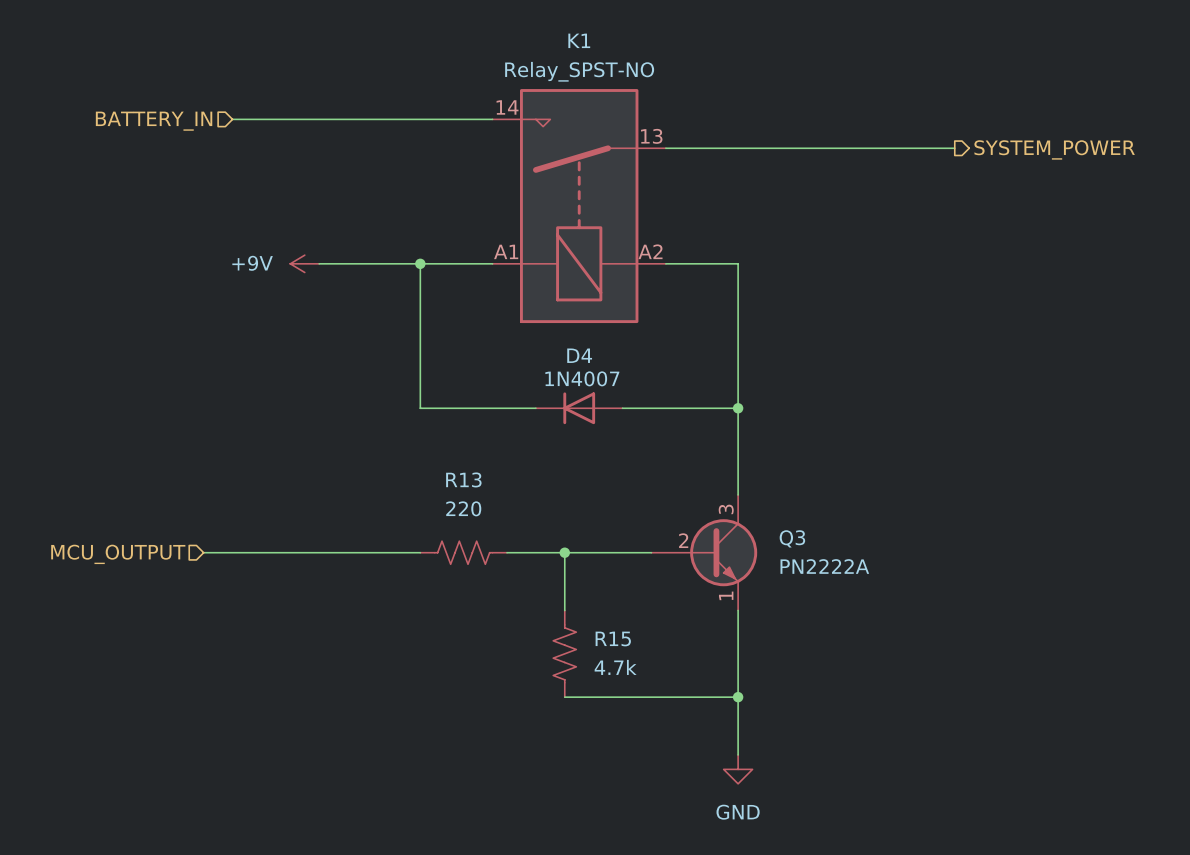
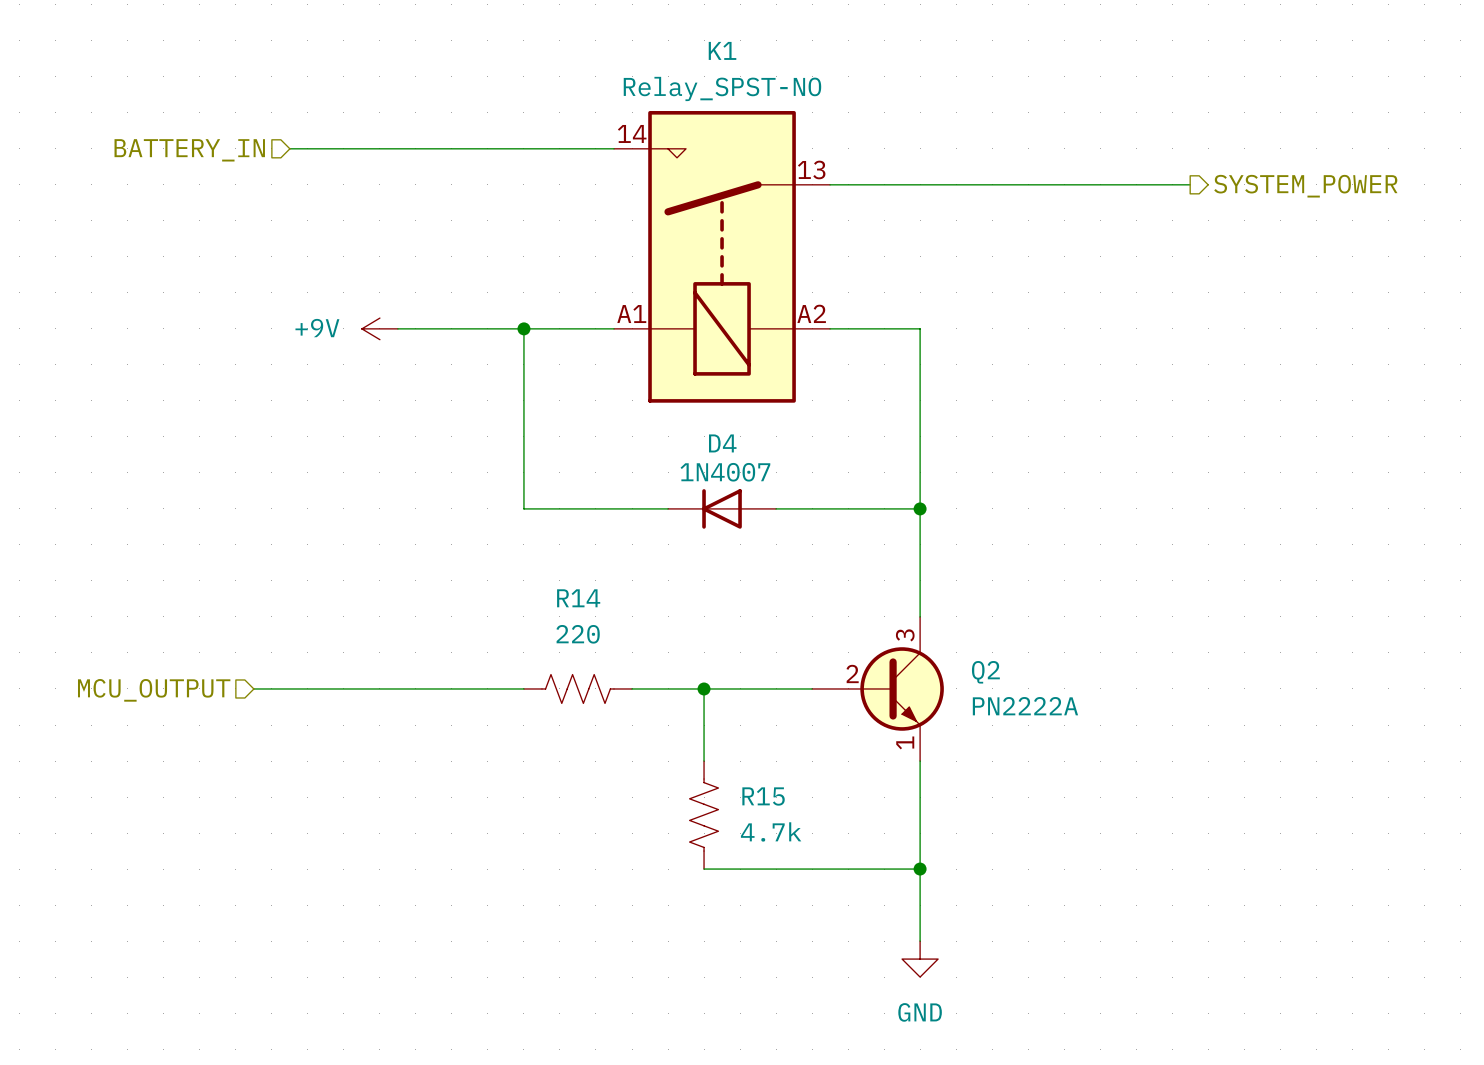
R13 name: R13 (463, 479) -> R14 (578, 598)
Q3 name: Q3 (792, 538) -> Q2 (985, 672)

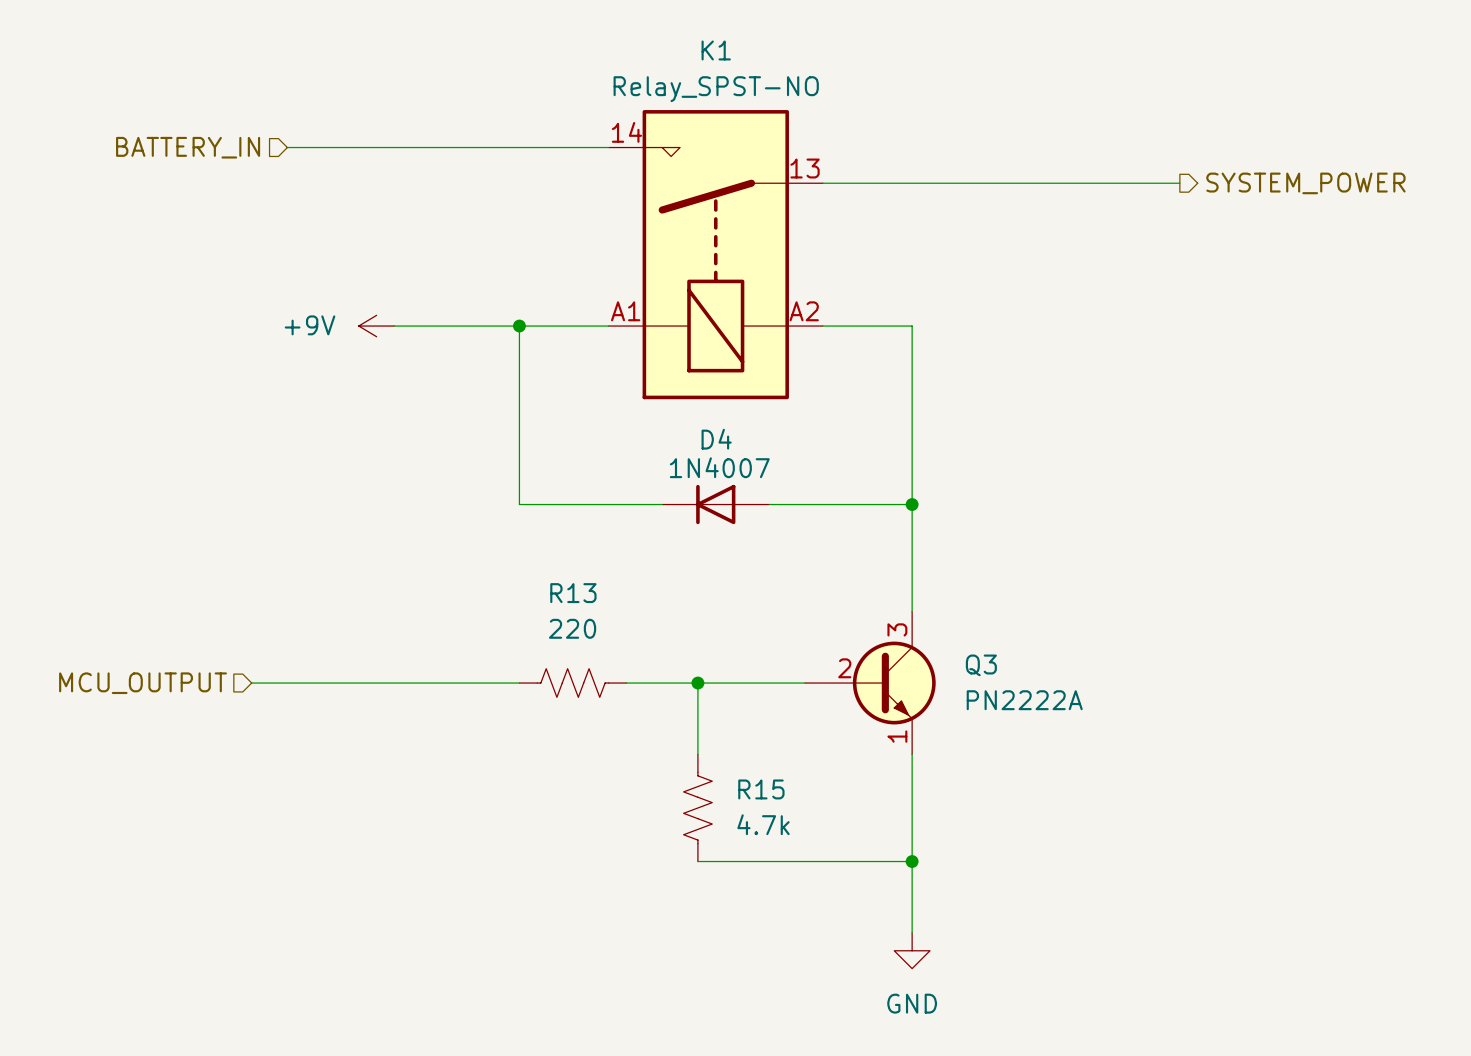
R14 name: R14 (578, 598) -> R13 (573, 593)
Q2 name: Q2 (985, 672) -> Q3 (981, 665)

